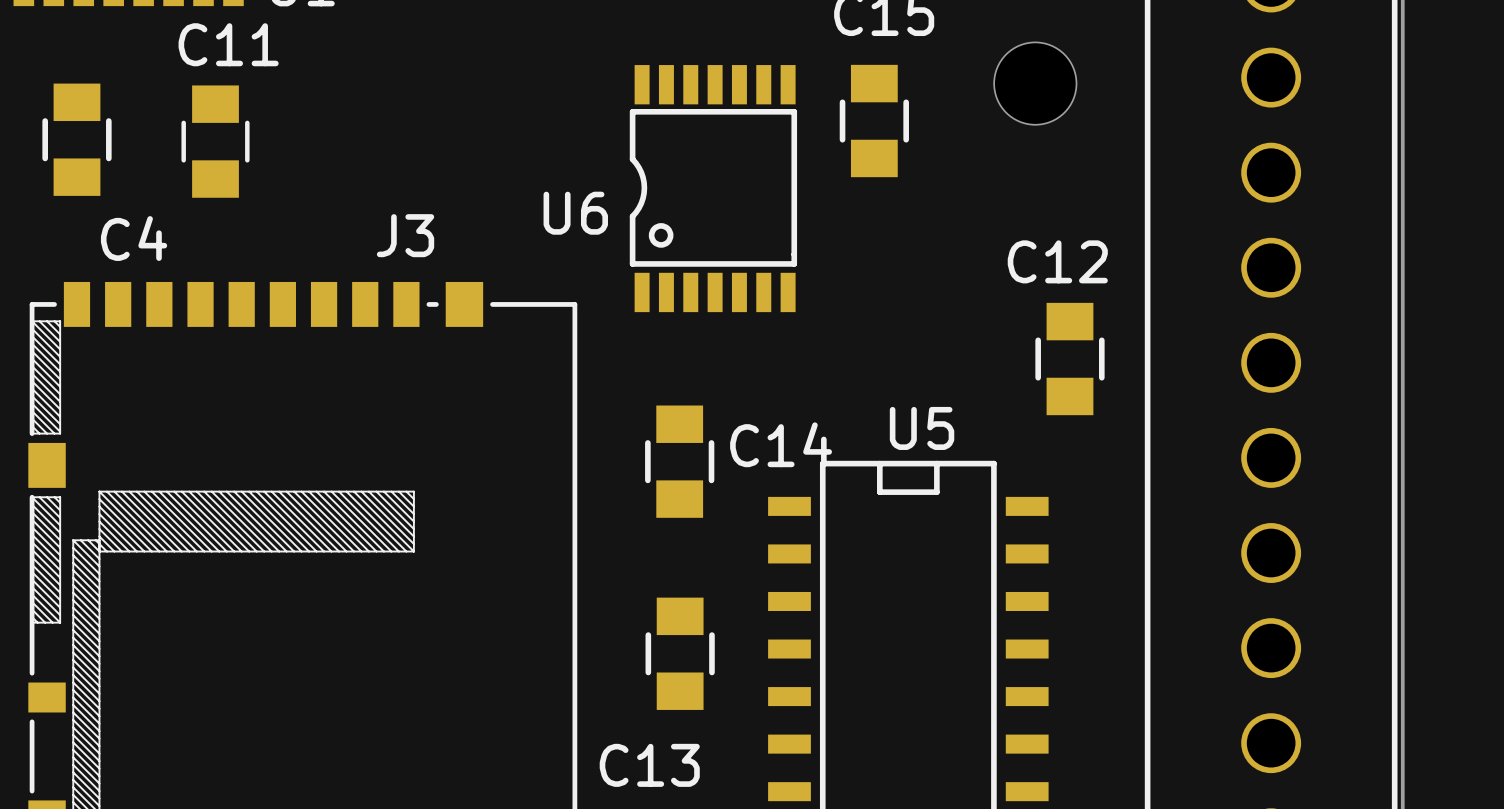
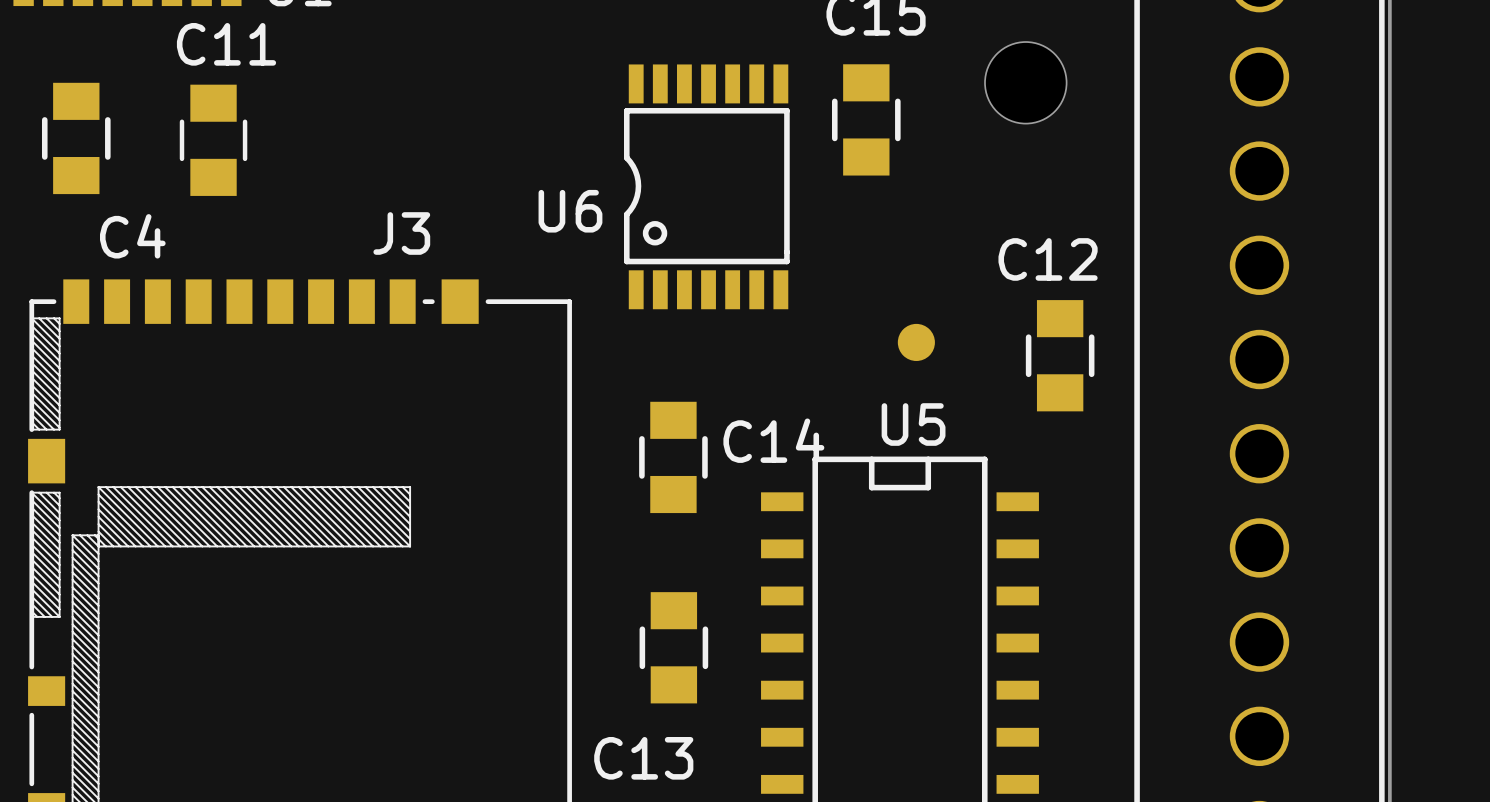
part: none -> (916, 342)

